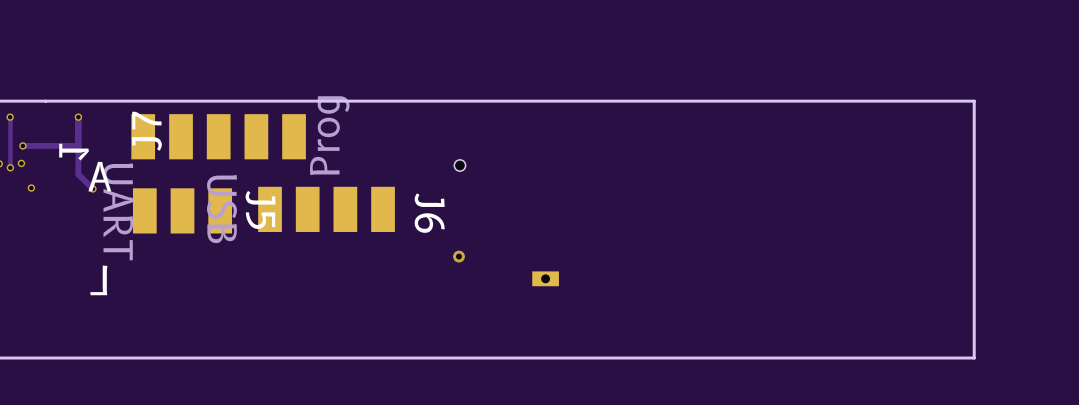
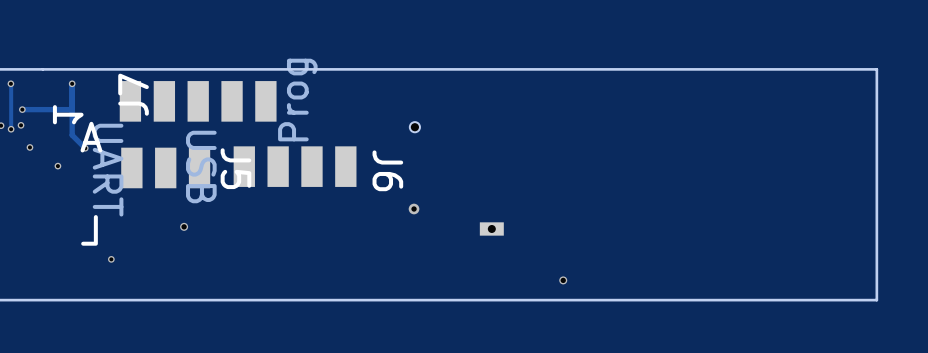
via: none -> (57, 166)
via: none -> (184, 226)
via: none -> (111, 259)
via: none -> (563, 280)

